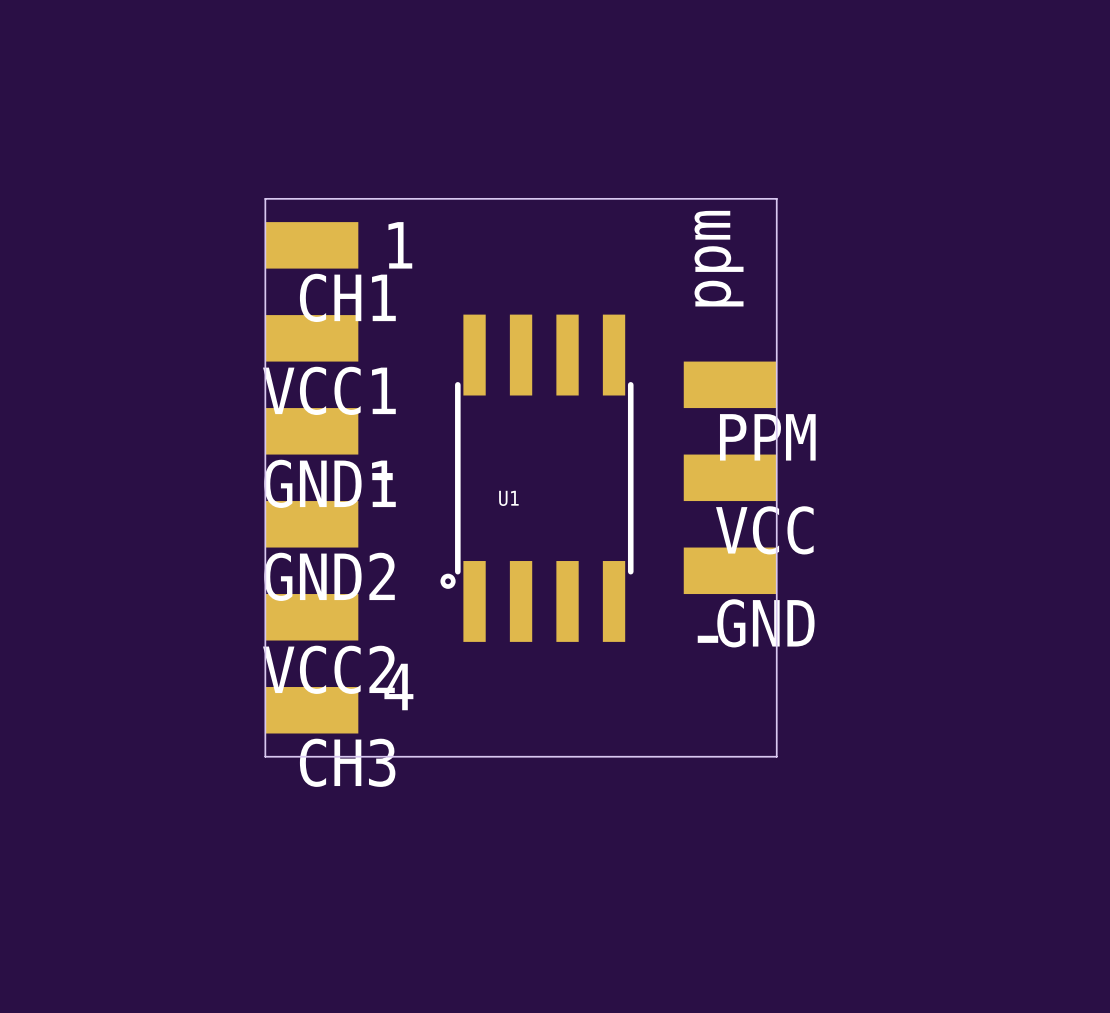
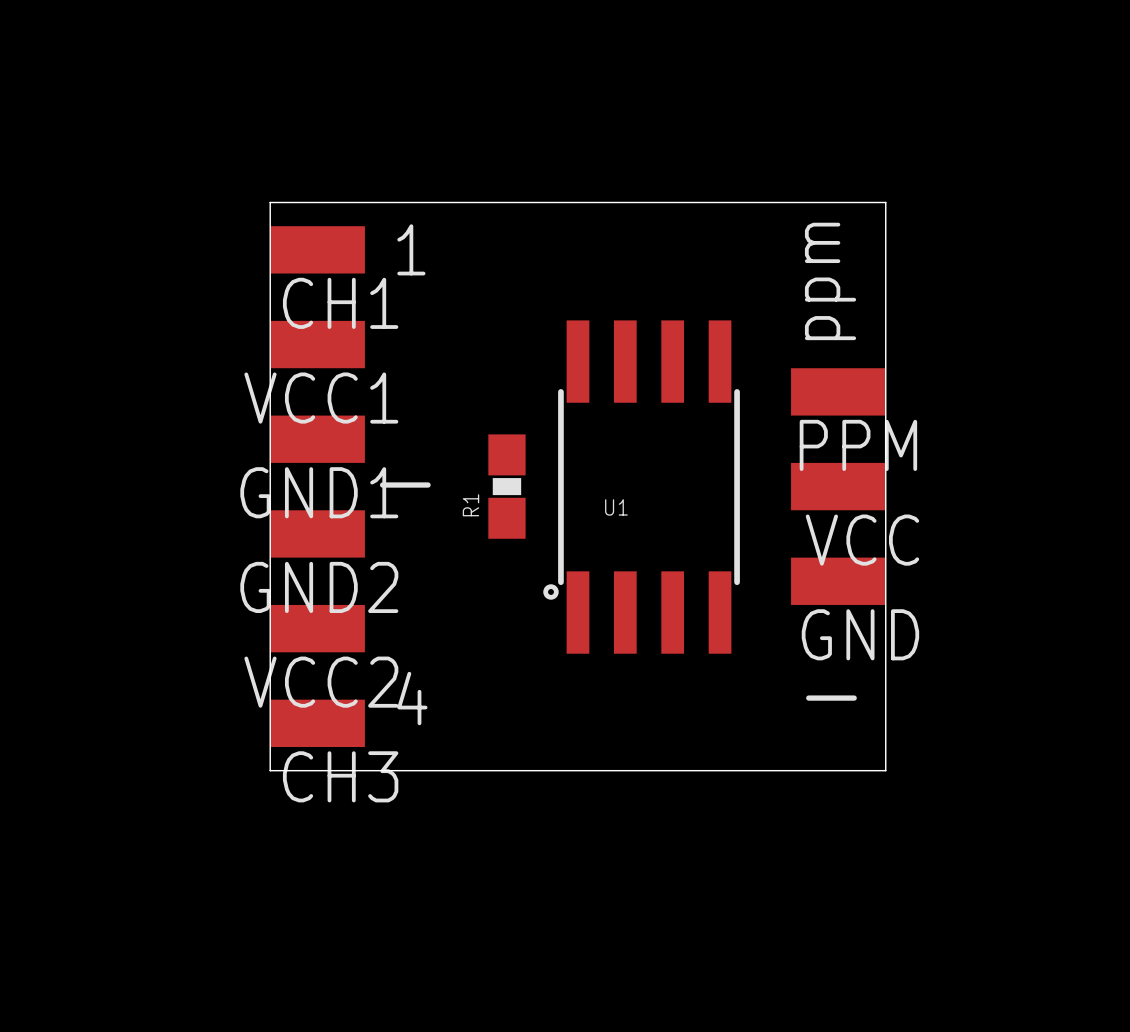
board edge: (776, 198) (776, 756) -> (791, 202) (885, 202) (885, 770) (791, 770)
text position: ppm (719, 258) -> ppm (830, 281)
PPM position: (730, 384) -> (838, 391)
R1: none -> (506, 486)
VCC position: (730, 477) -> (838, 486)
U1 position: (537, 478) -> (641, 487)
GND position: (730, 570) -> (838, 581)
text position: - (707, 639) -> - (831, 698)

